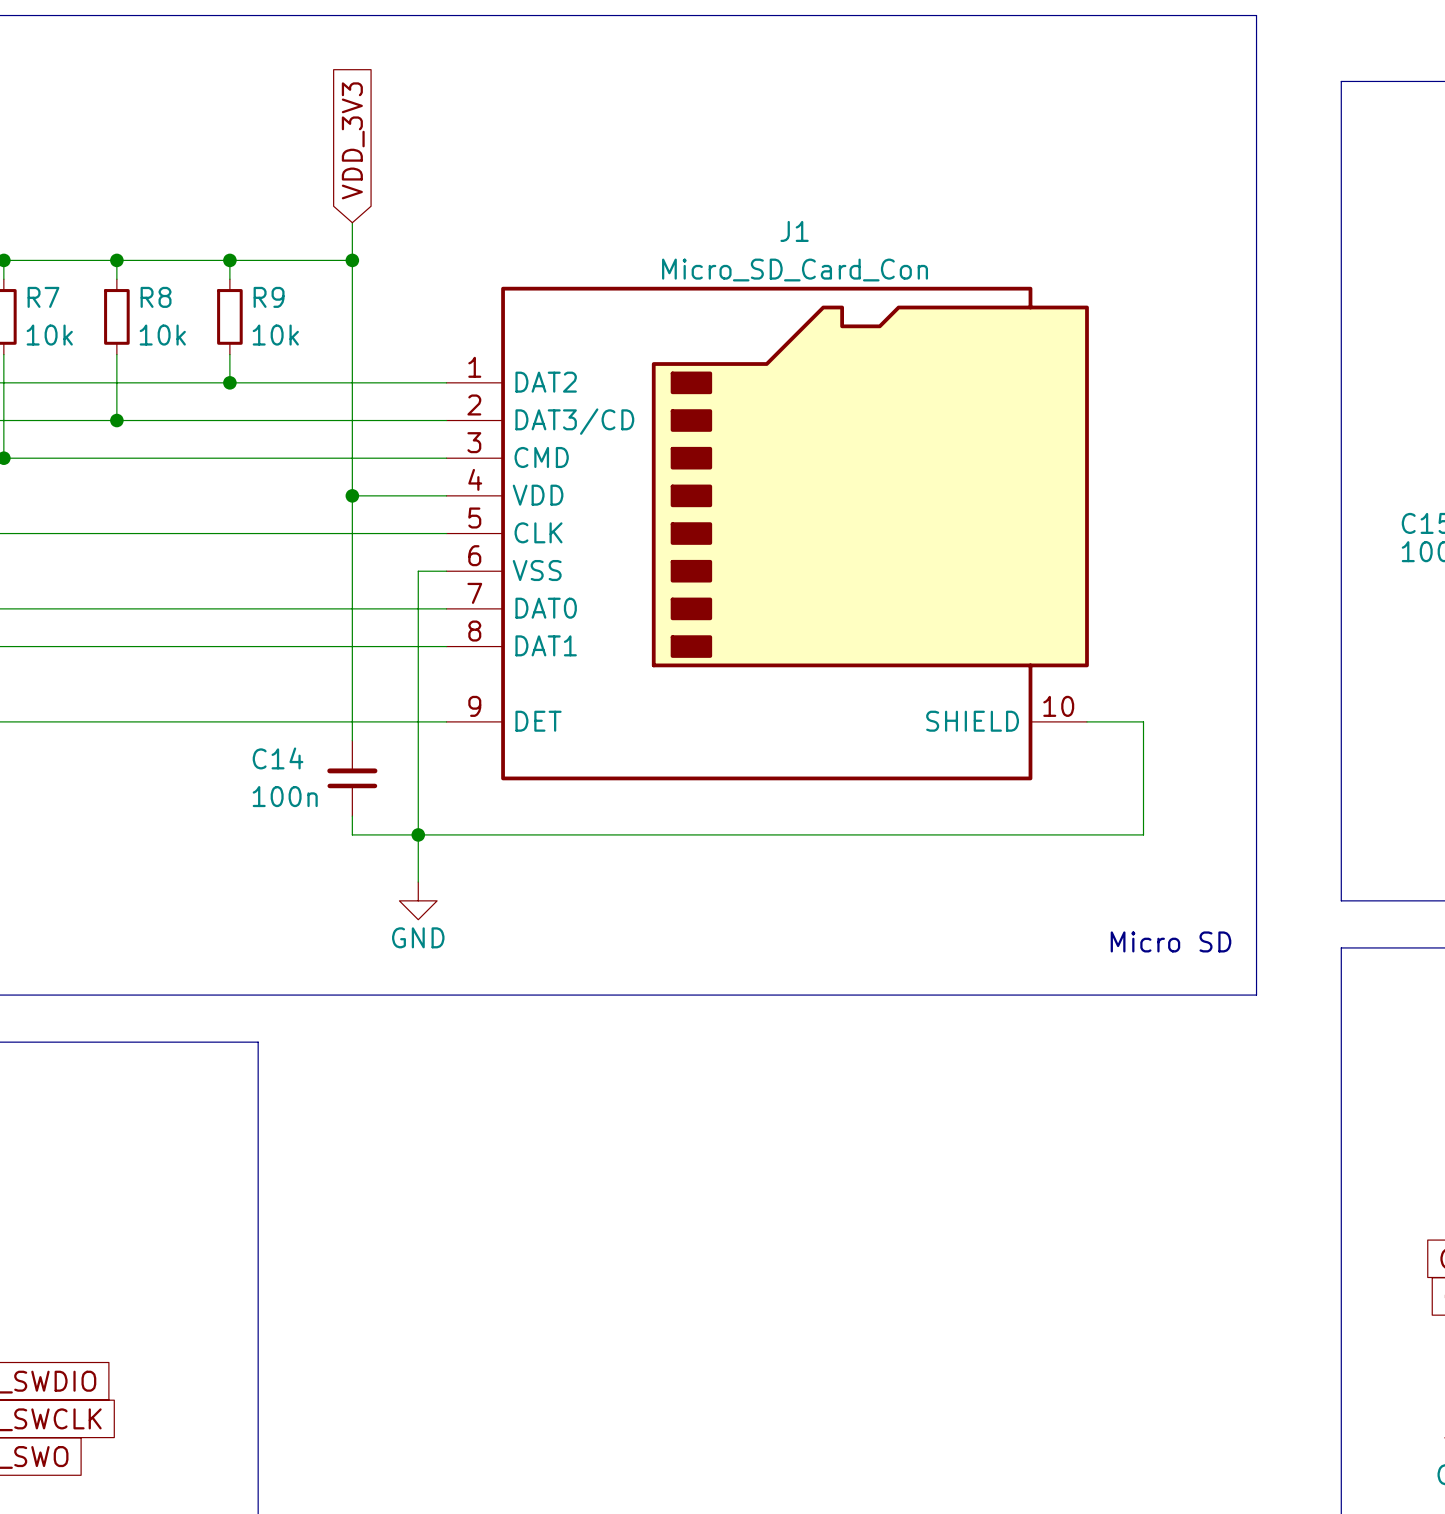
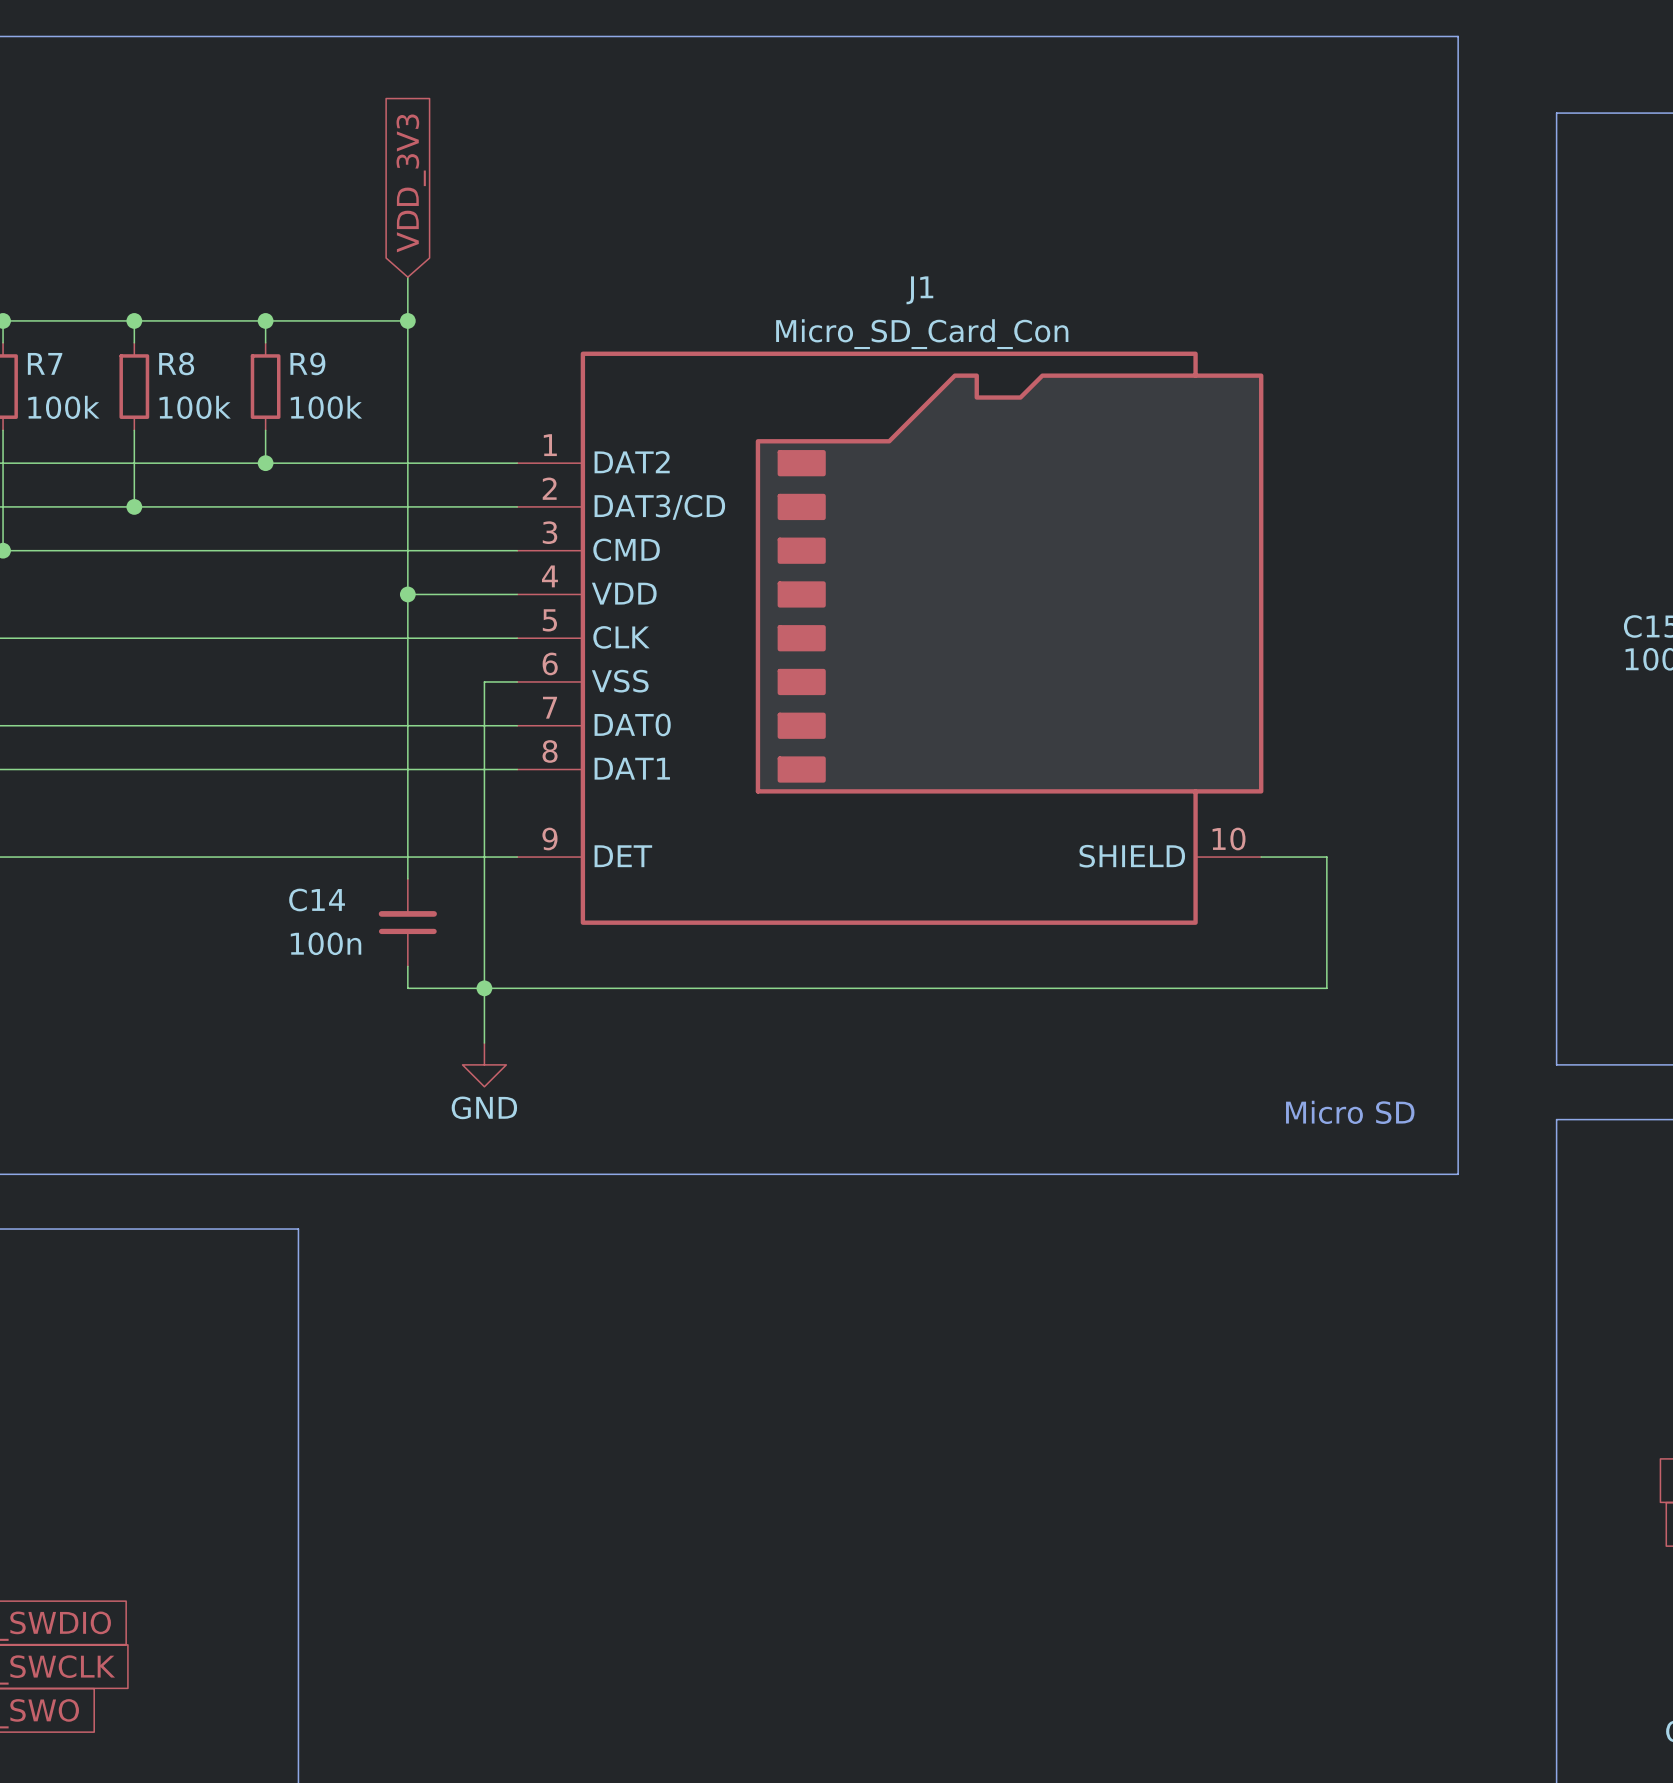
R7 value: 10k (49, 335) -> 100k (63, 407)
R8 value: 10k (162, 335) -> 100k (195, 407)
R9 value: 10k (275, 335) -> 100k (326, 407)

